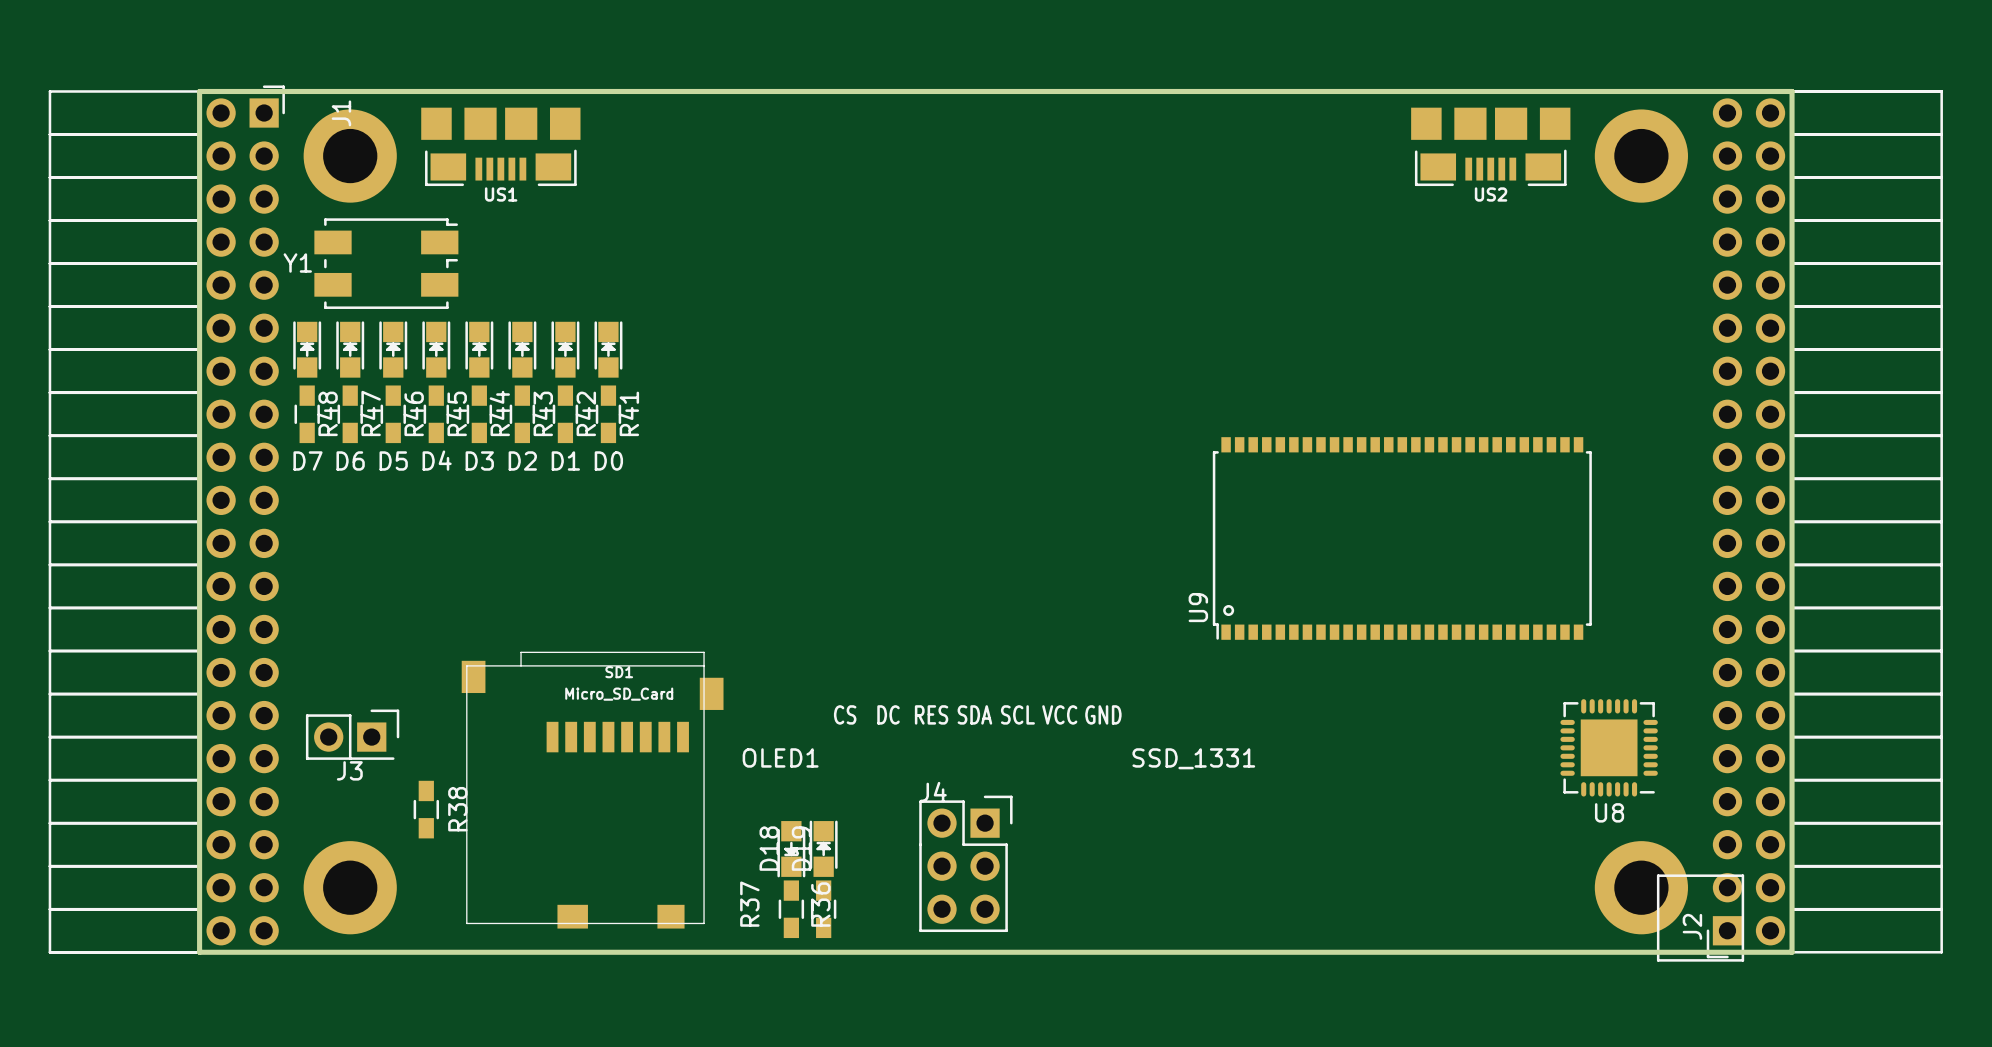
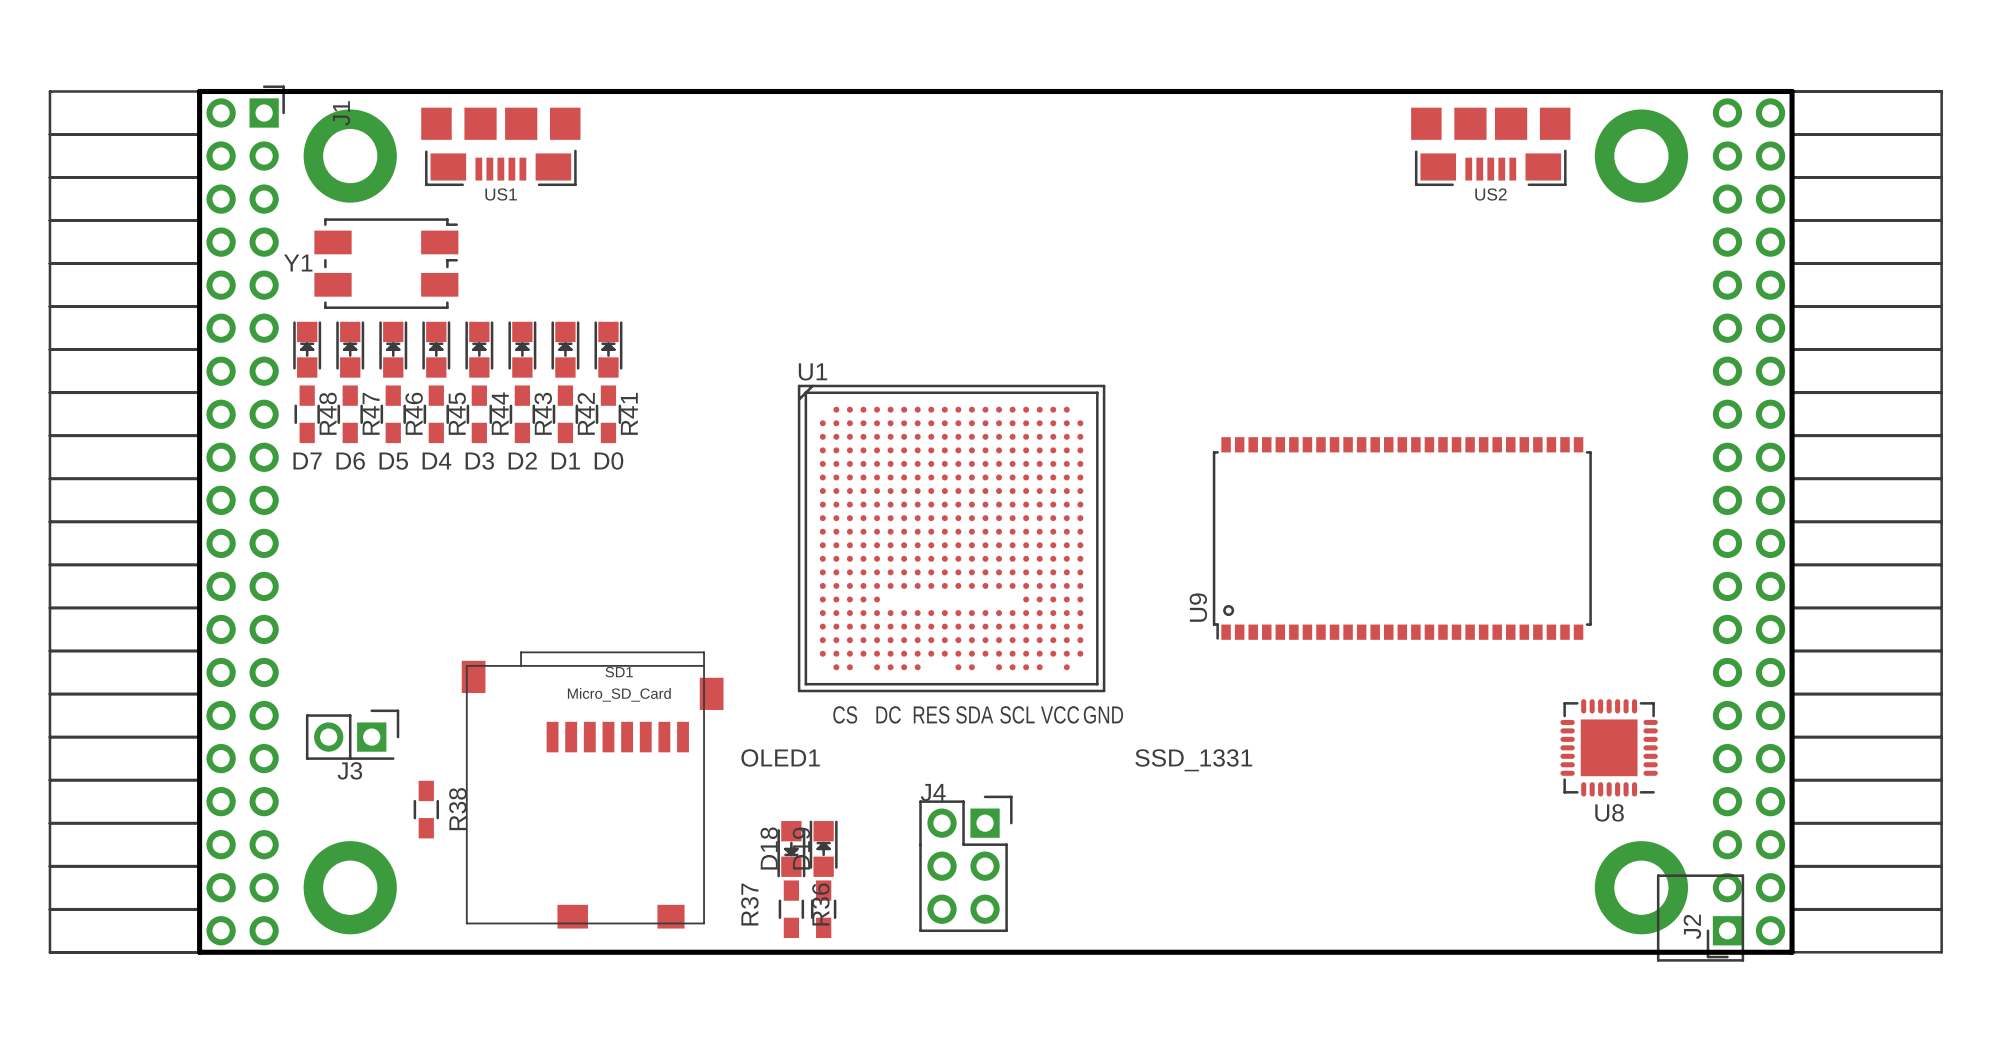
U1: none -> (951, 538)

